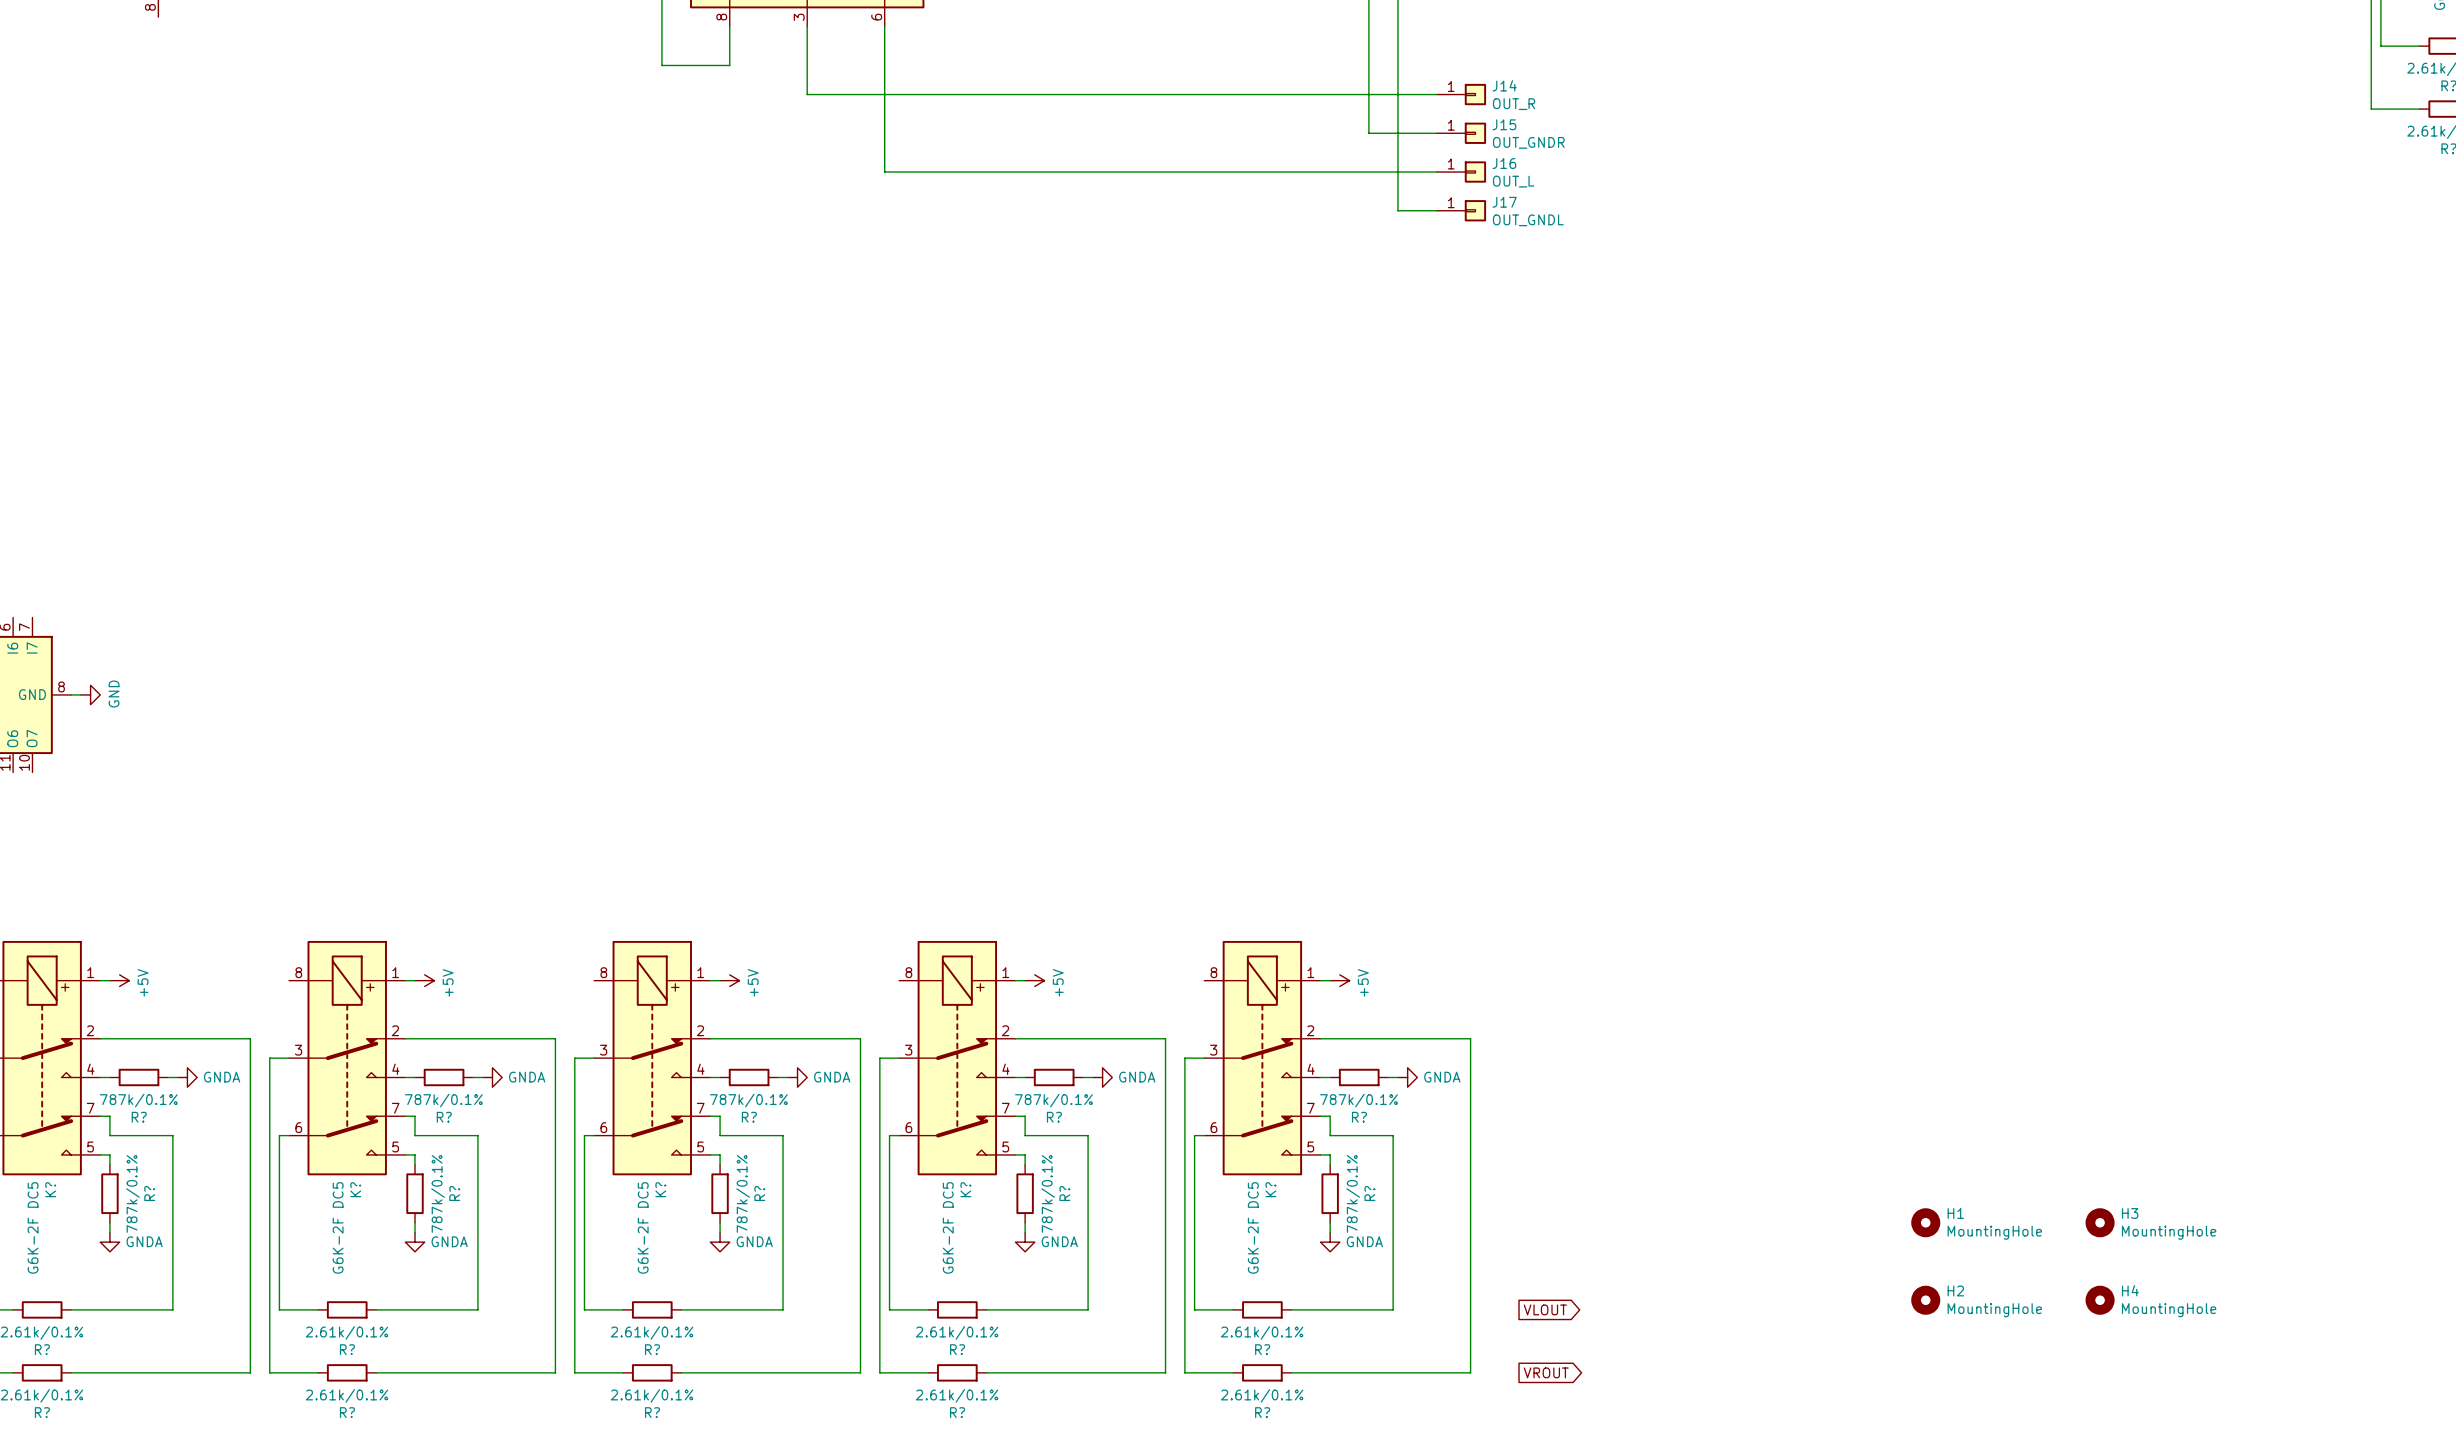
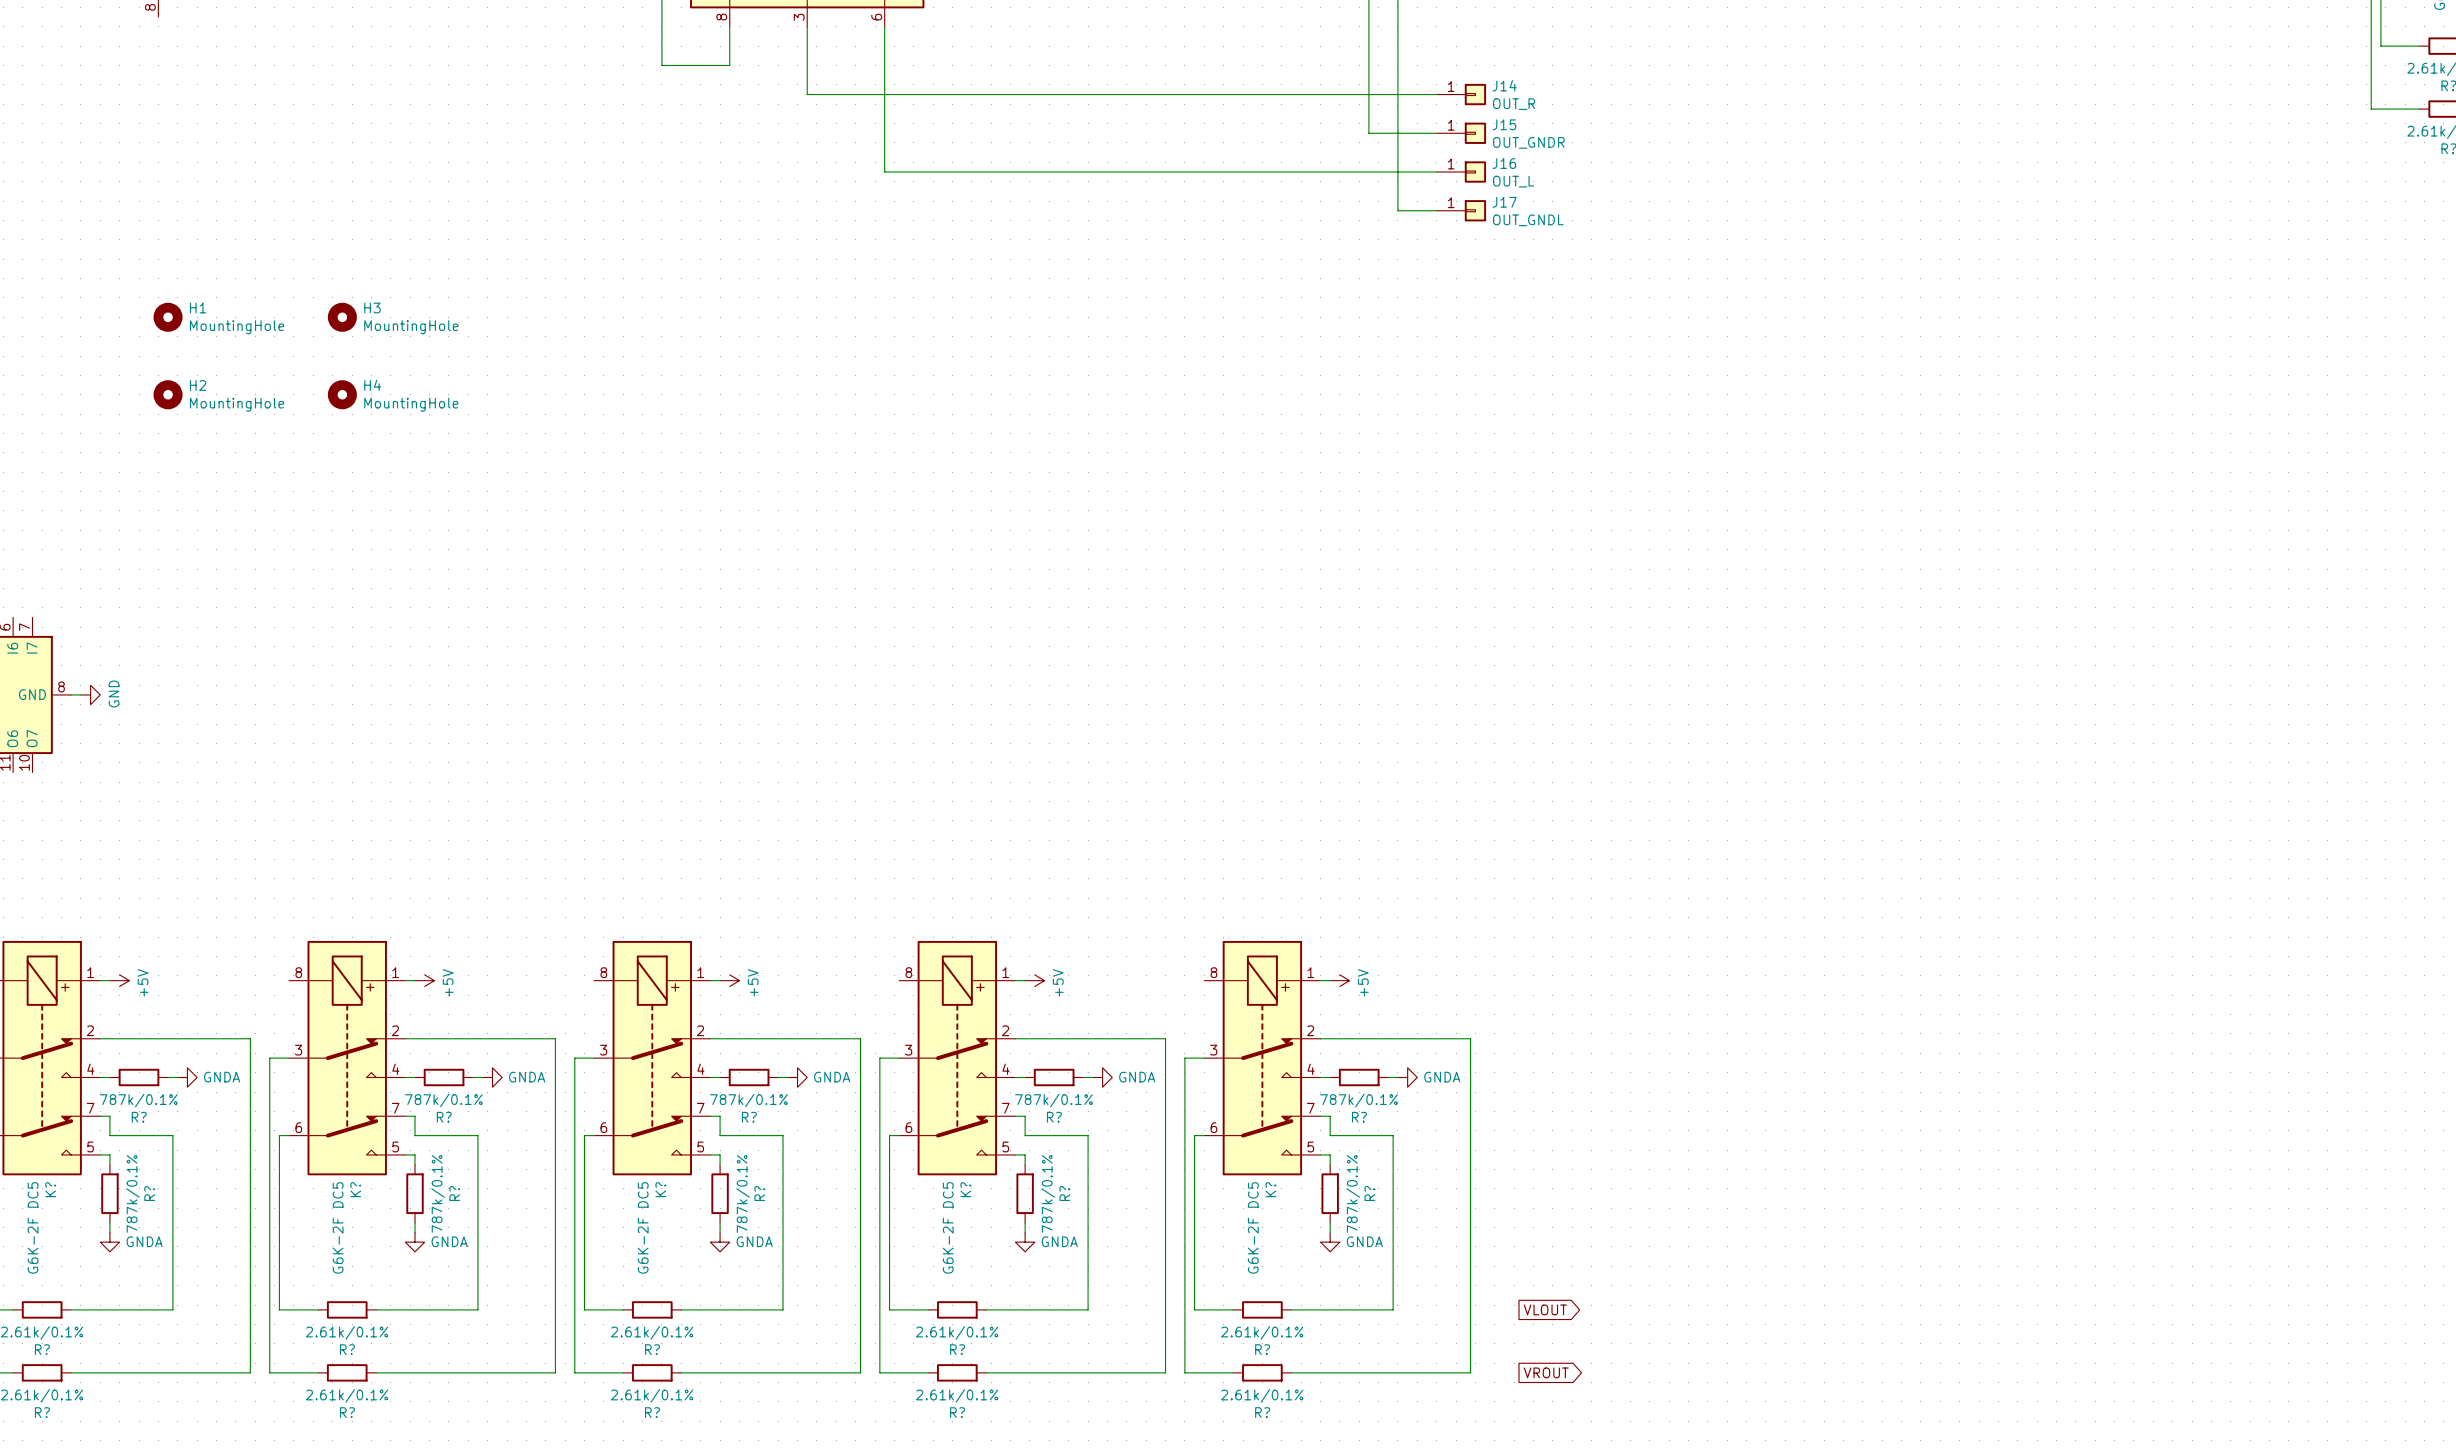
H1 position: (1925, 1222) -> (168, 317)
H3 position: (2100, 1222) -> (342, 317)
H2 position: (1925, 1300) -> (168, 394)
H4 position: (2100, 1300) -> (342, 394)

